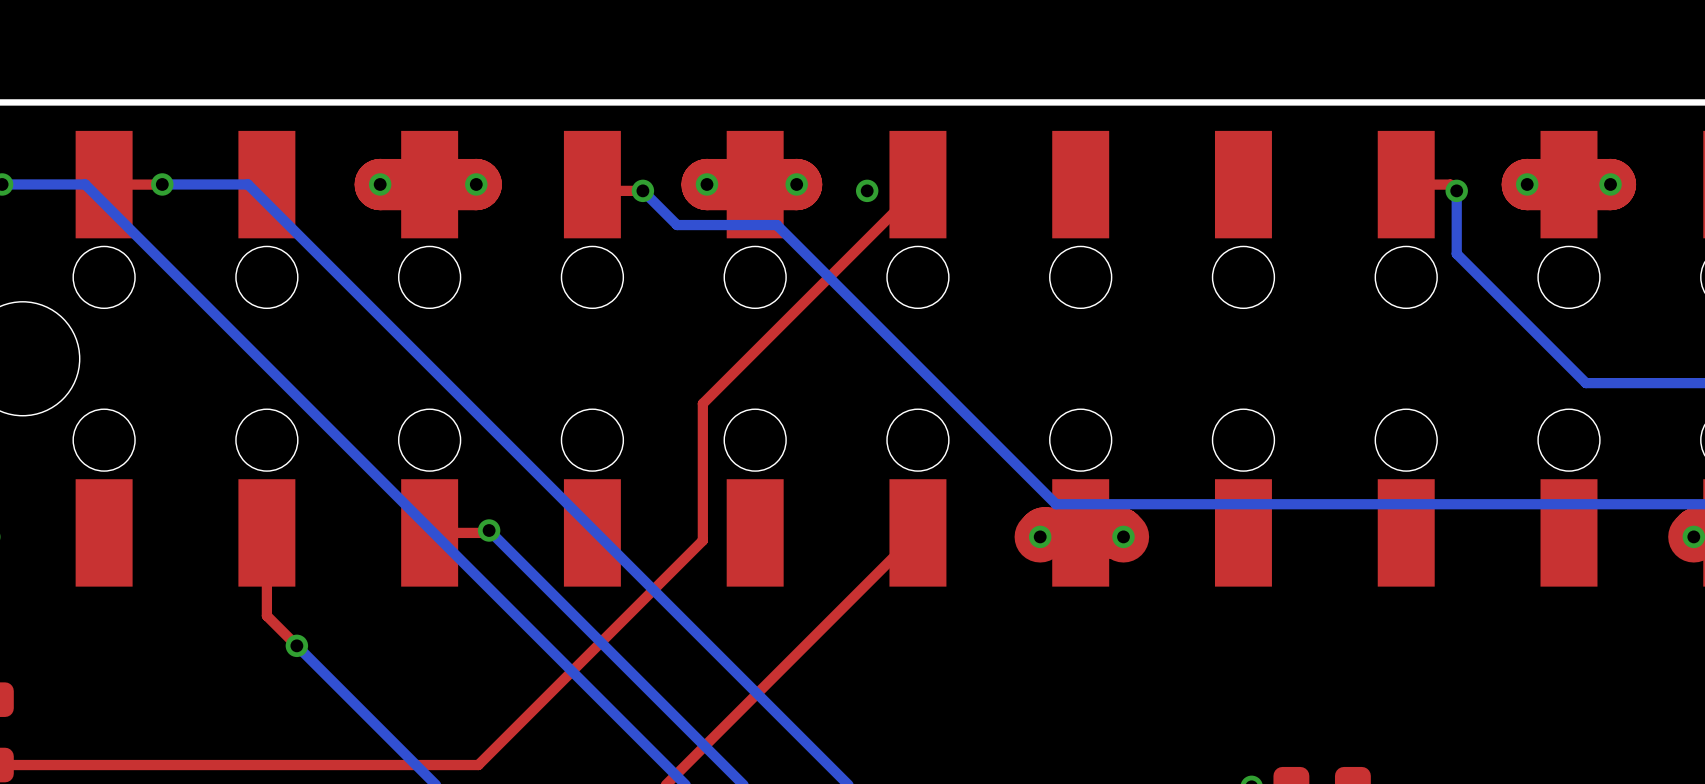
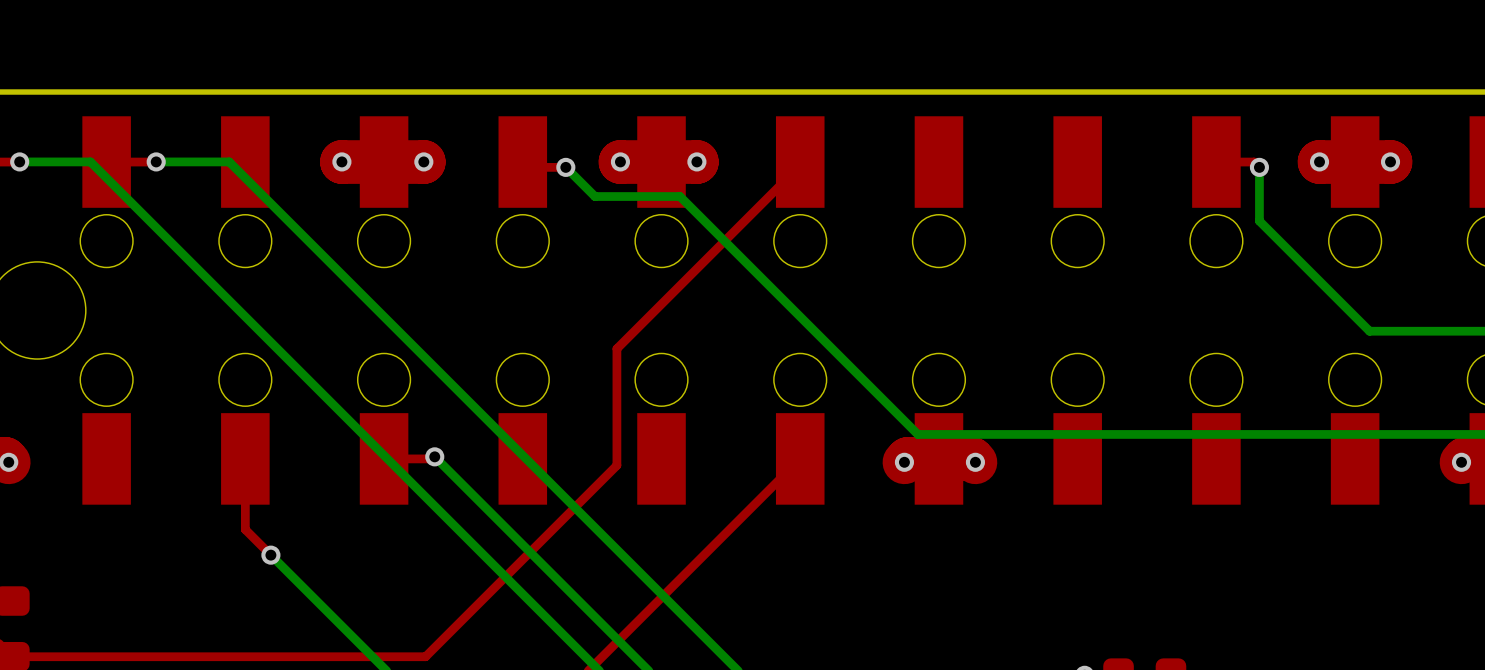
via: (867, 190) -> none

